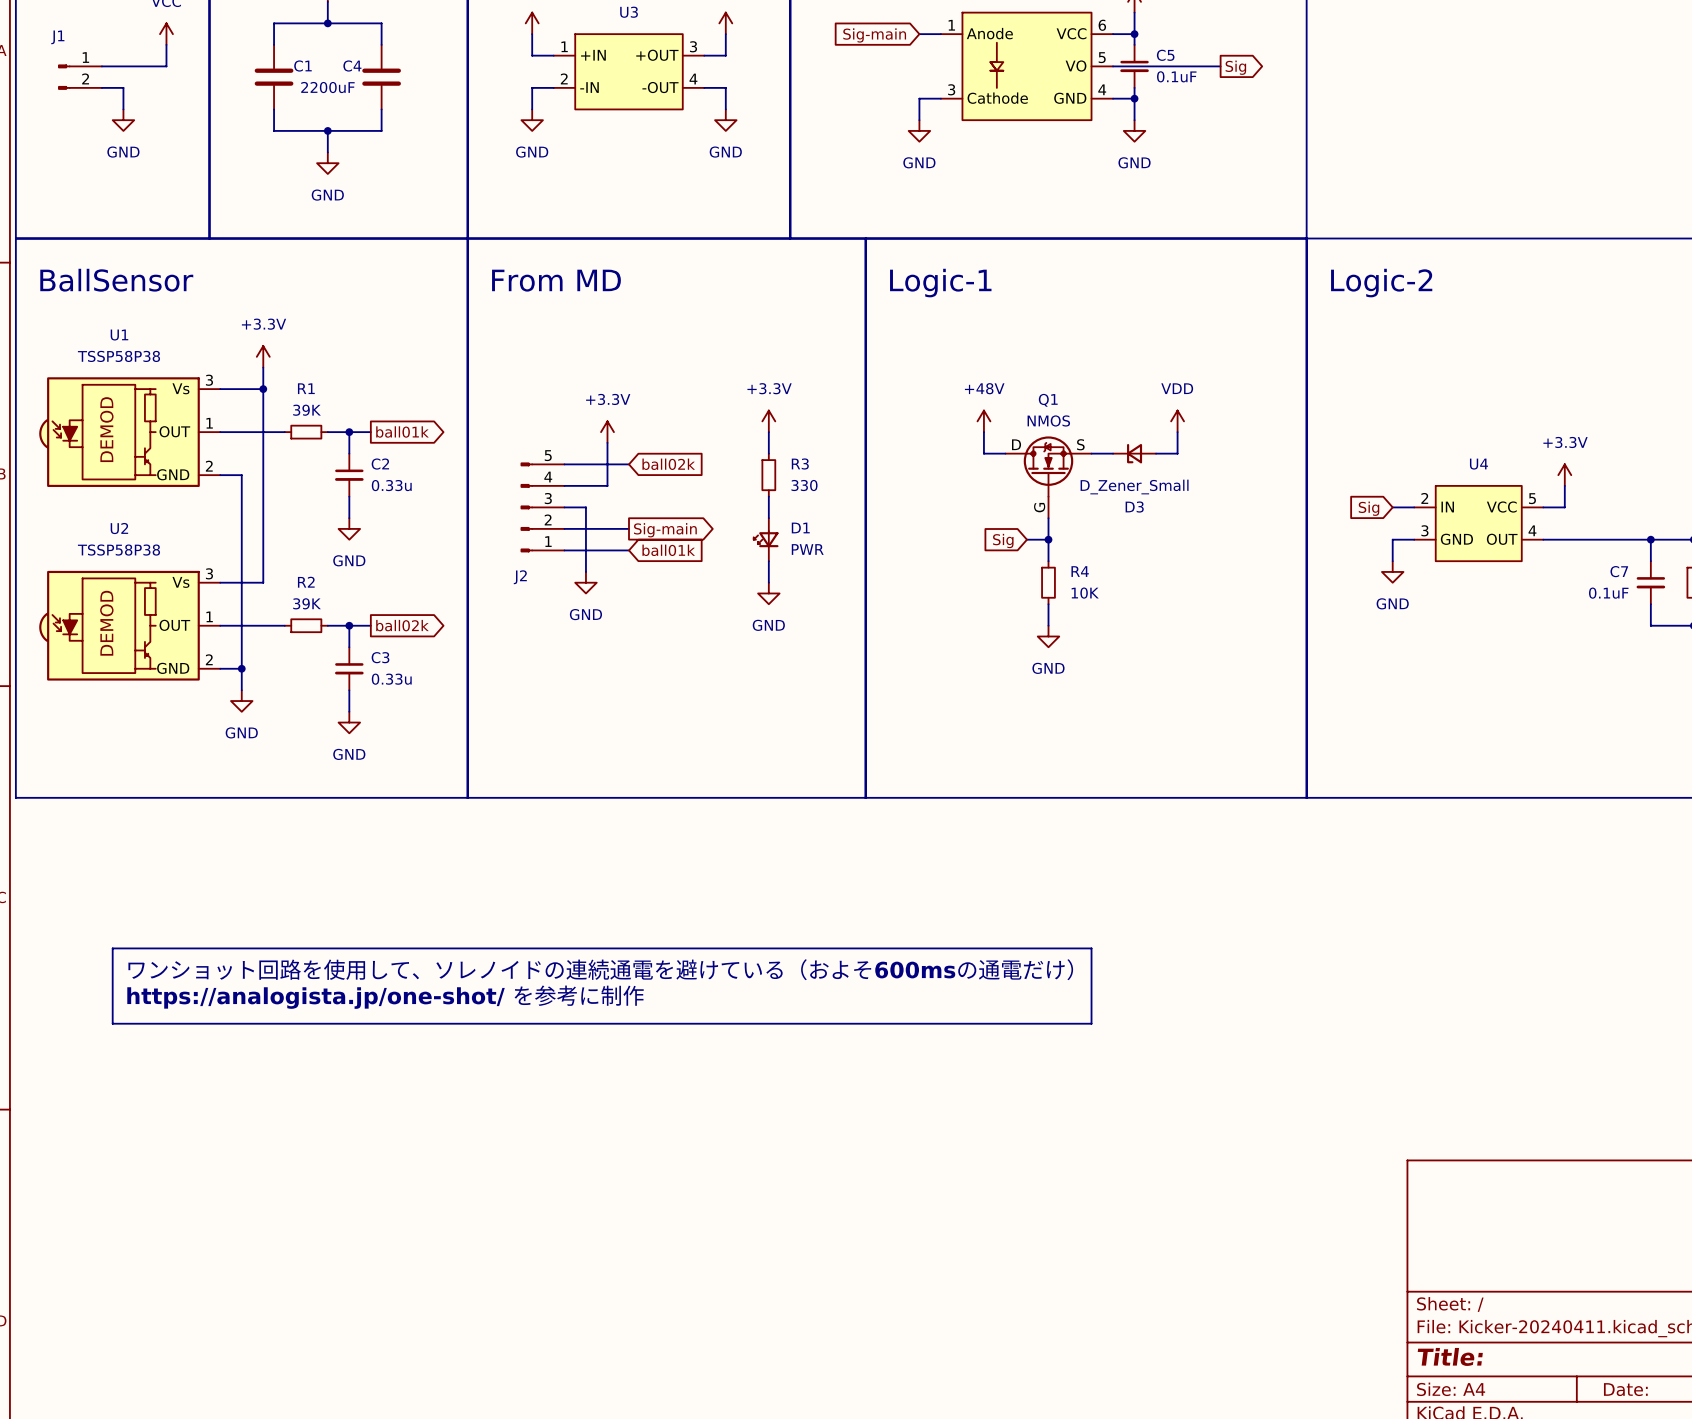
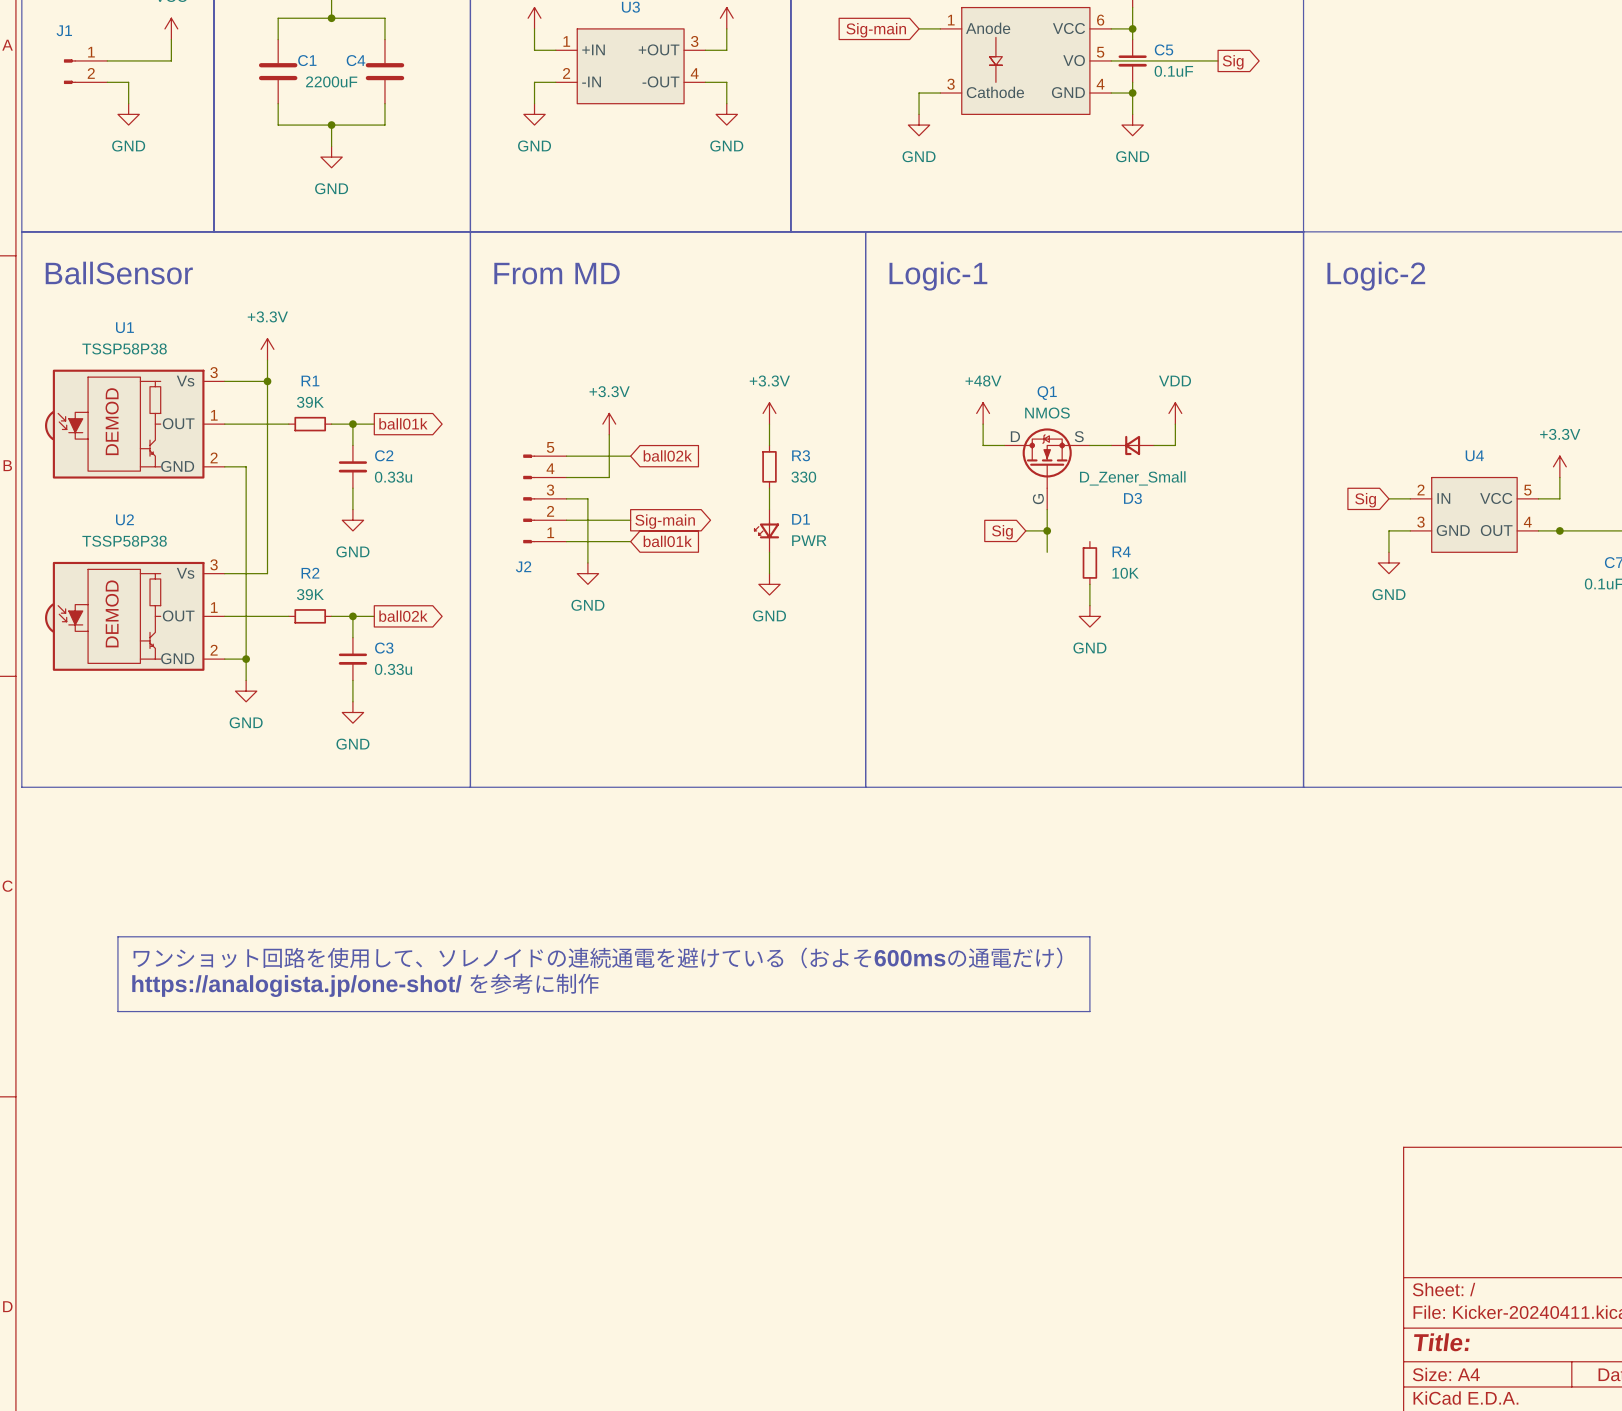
junction: none -> (1559, 530)
R4 position: (1048, 582) -> (1089, 562)
wire: (1048, 604) (1048, 625) -> (1089, 584) (1089, 605)
power symbol position: GND (1048, 636) -> GND (1089, 616)

